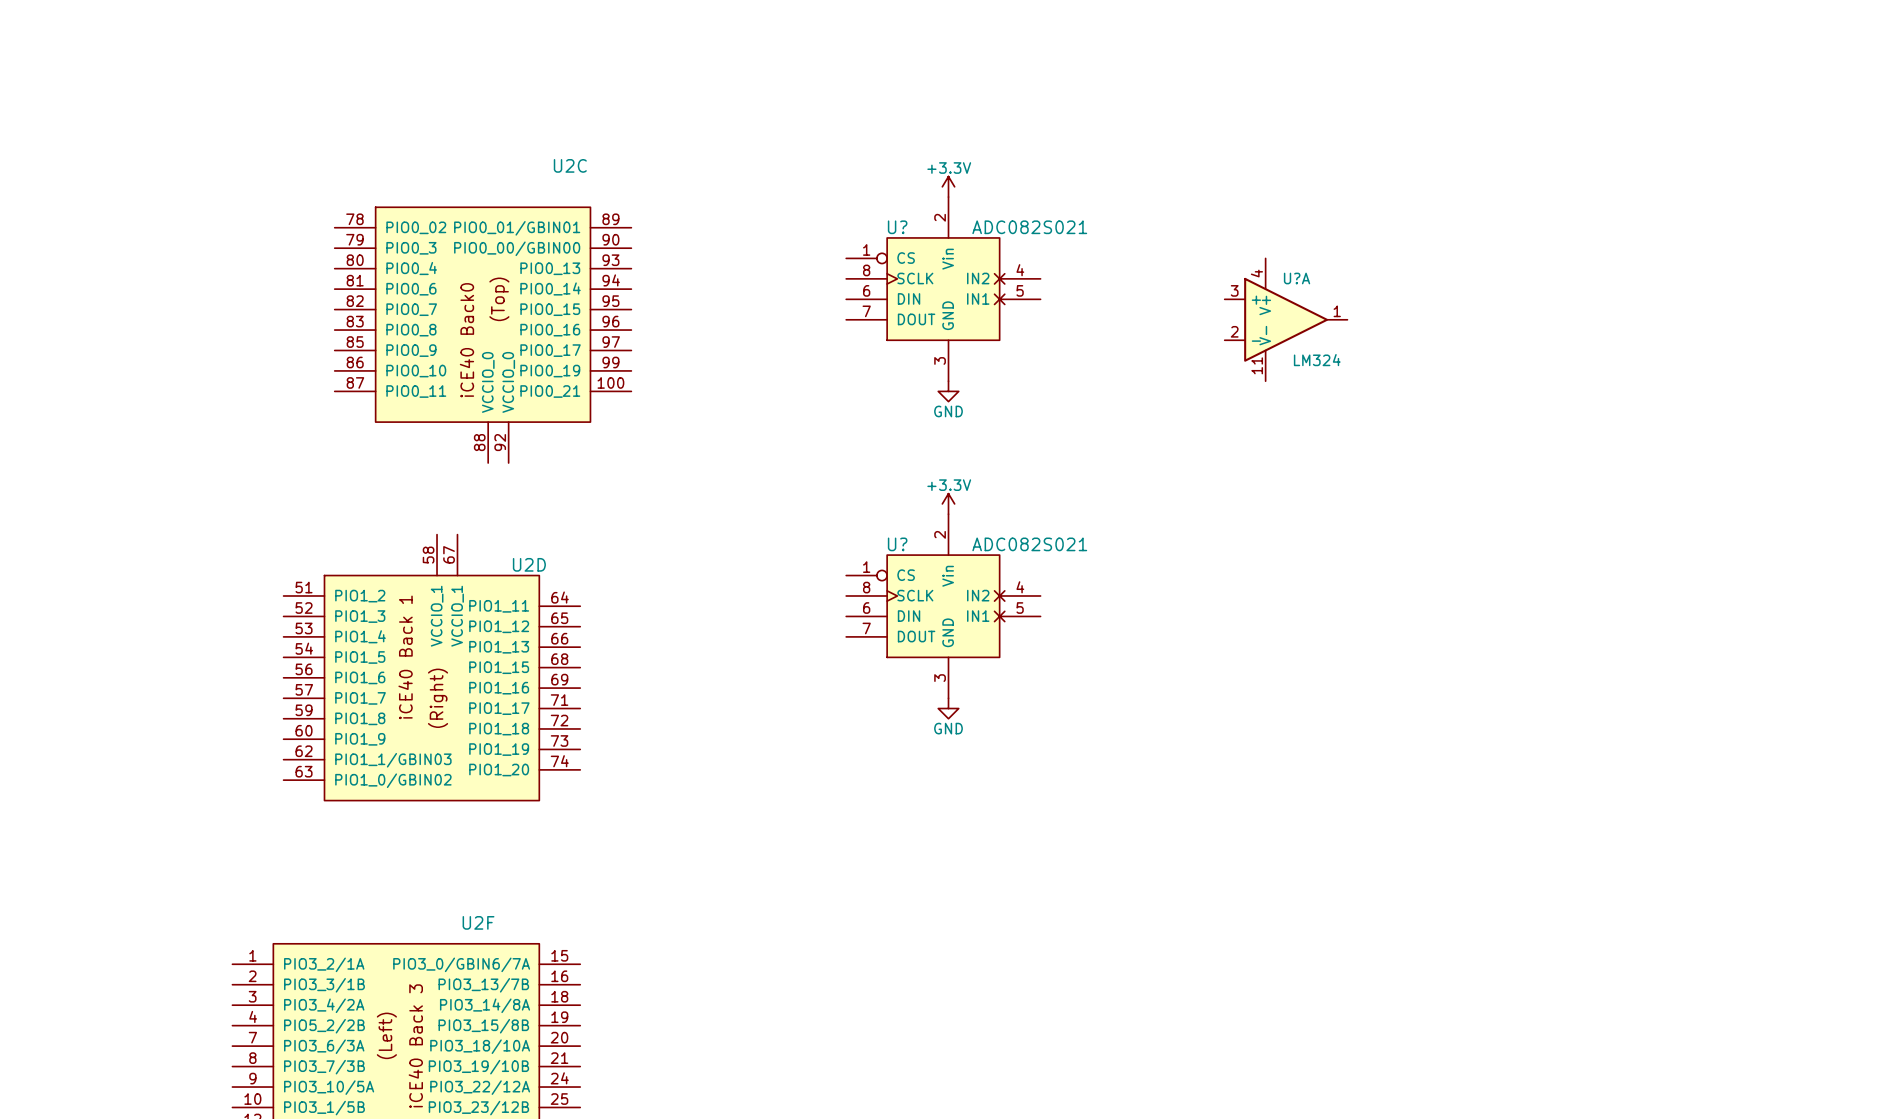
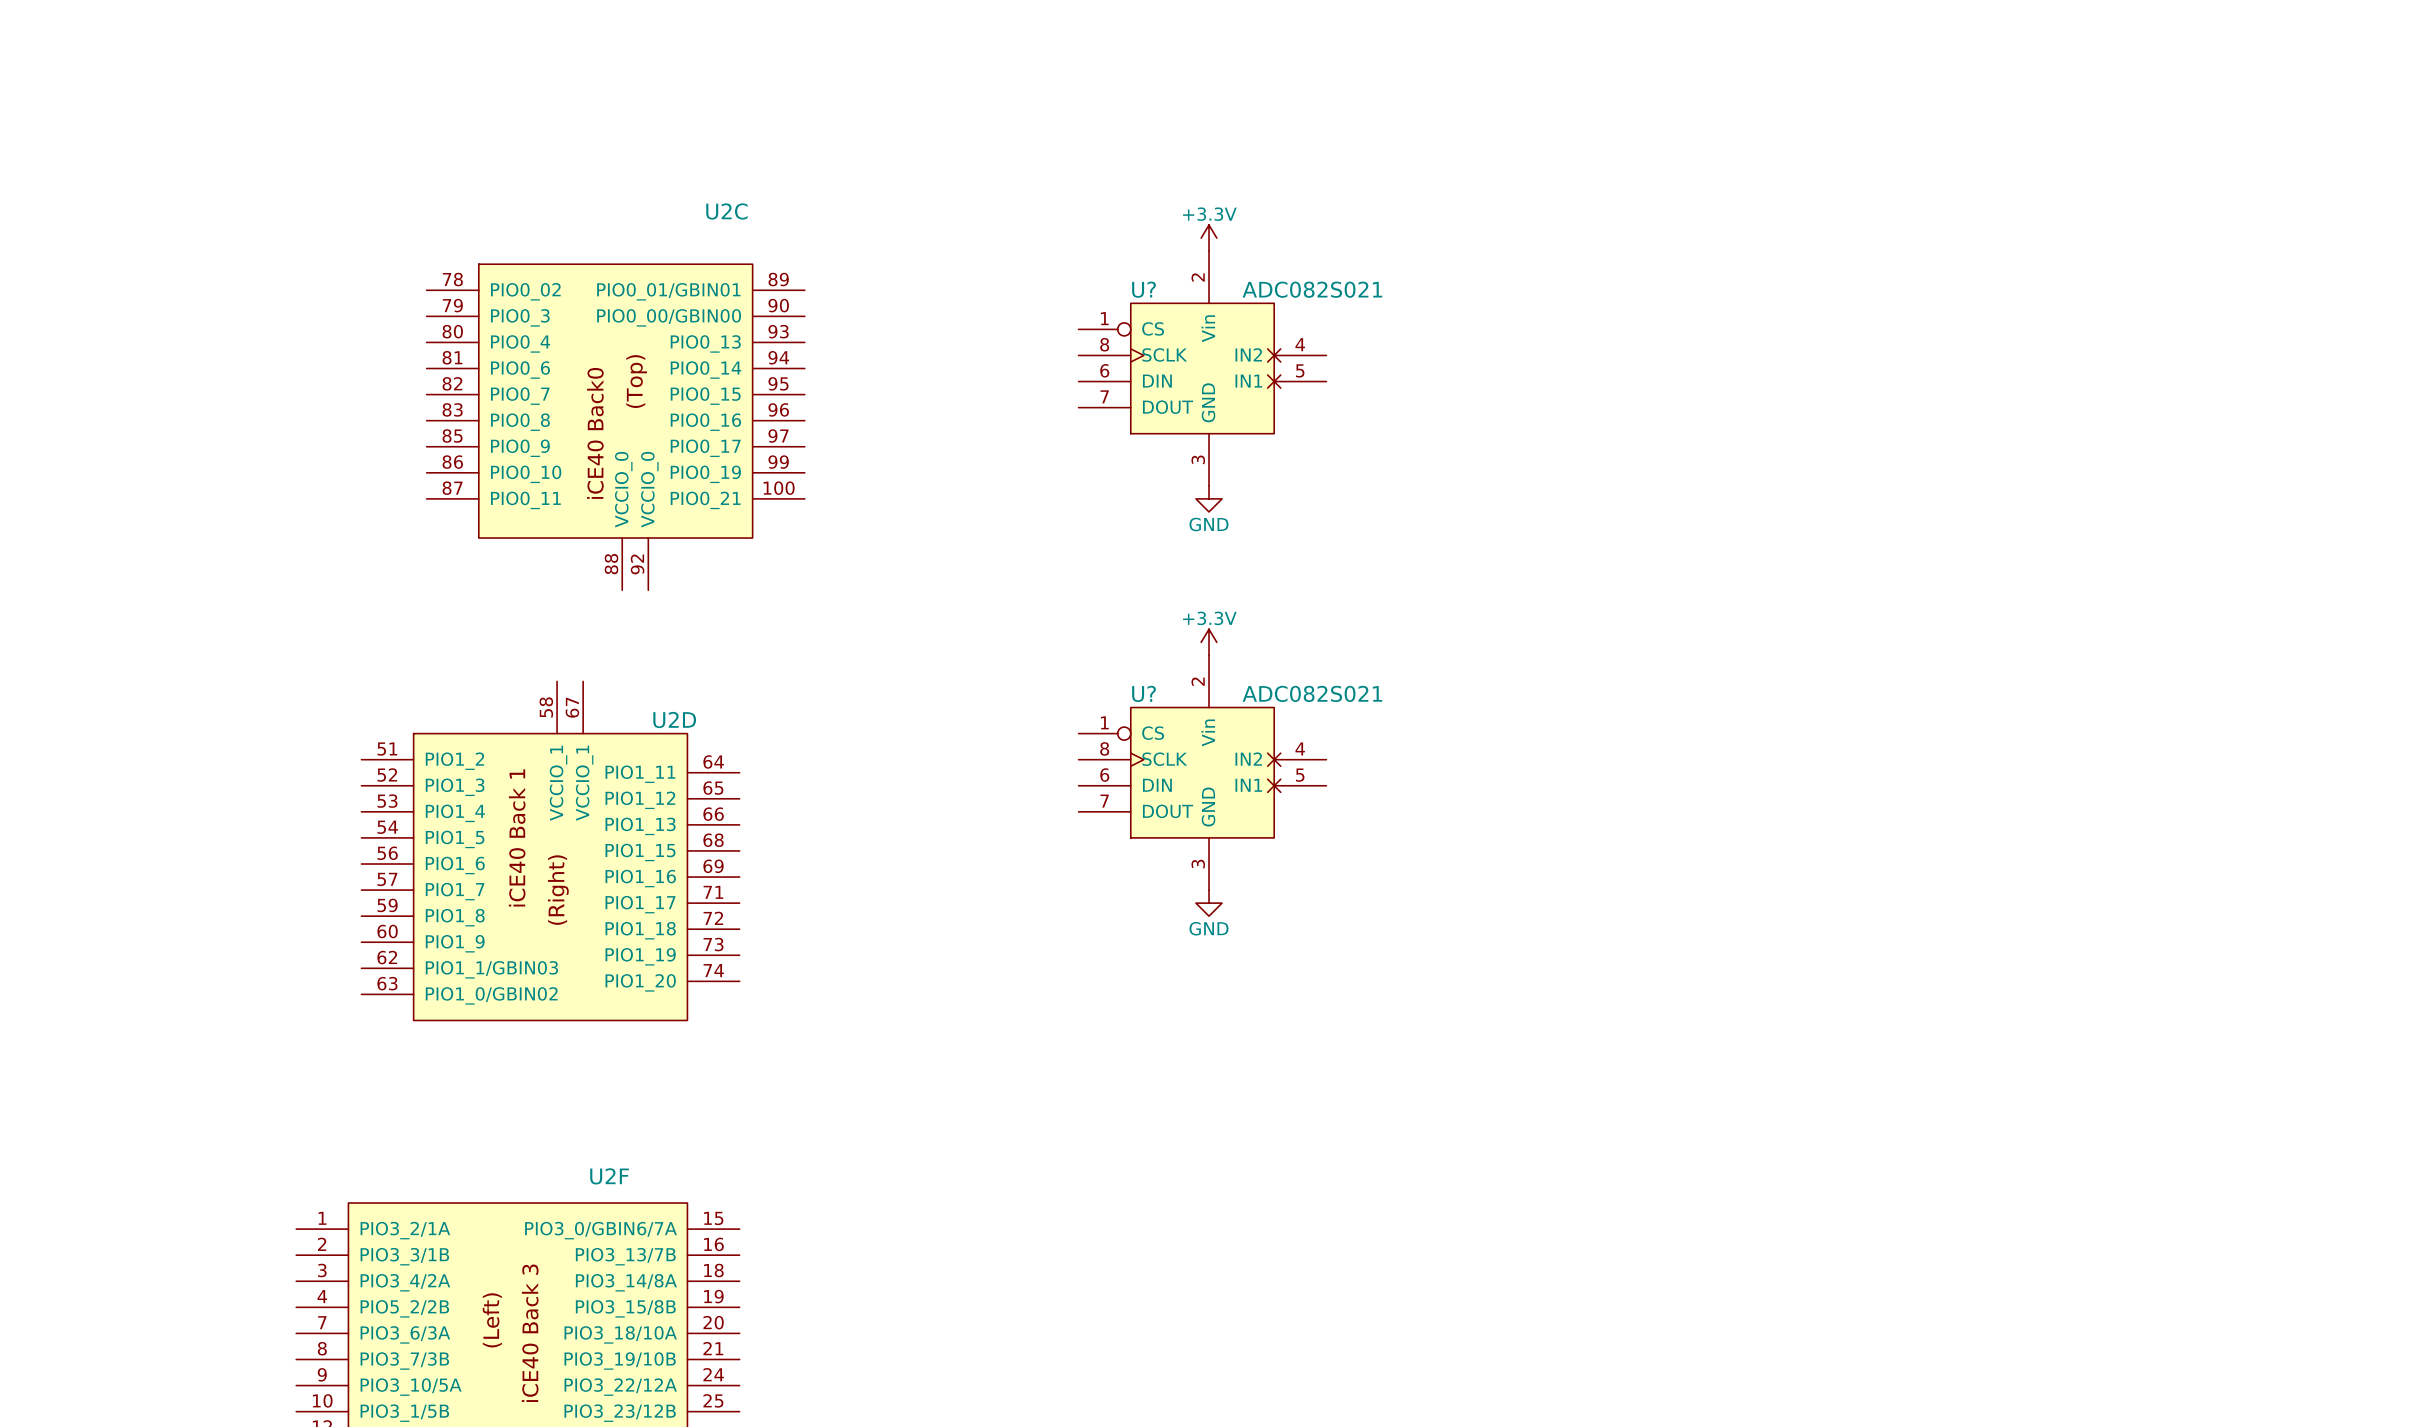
U?A: LM324 (1286, 319) -> none

